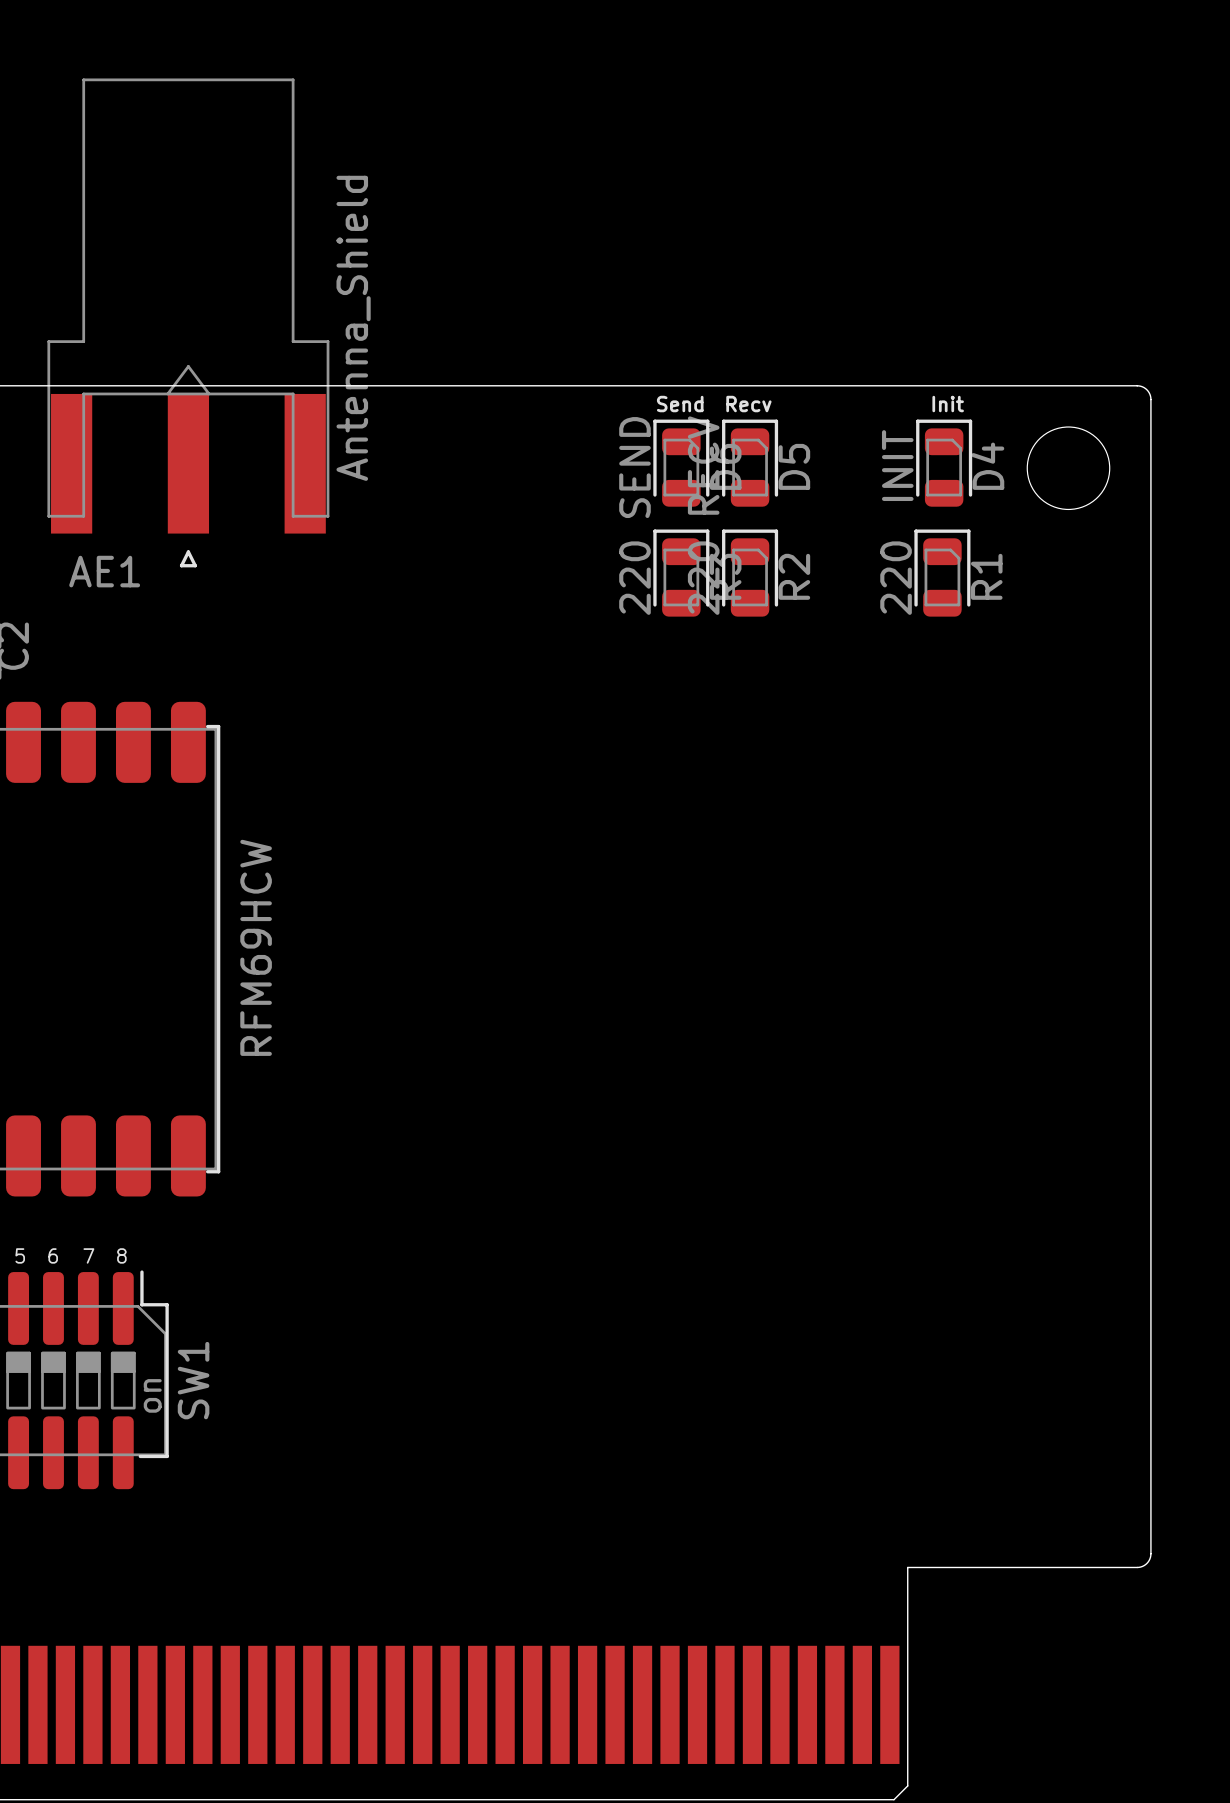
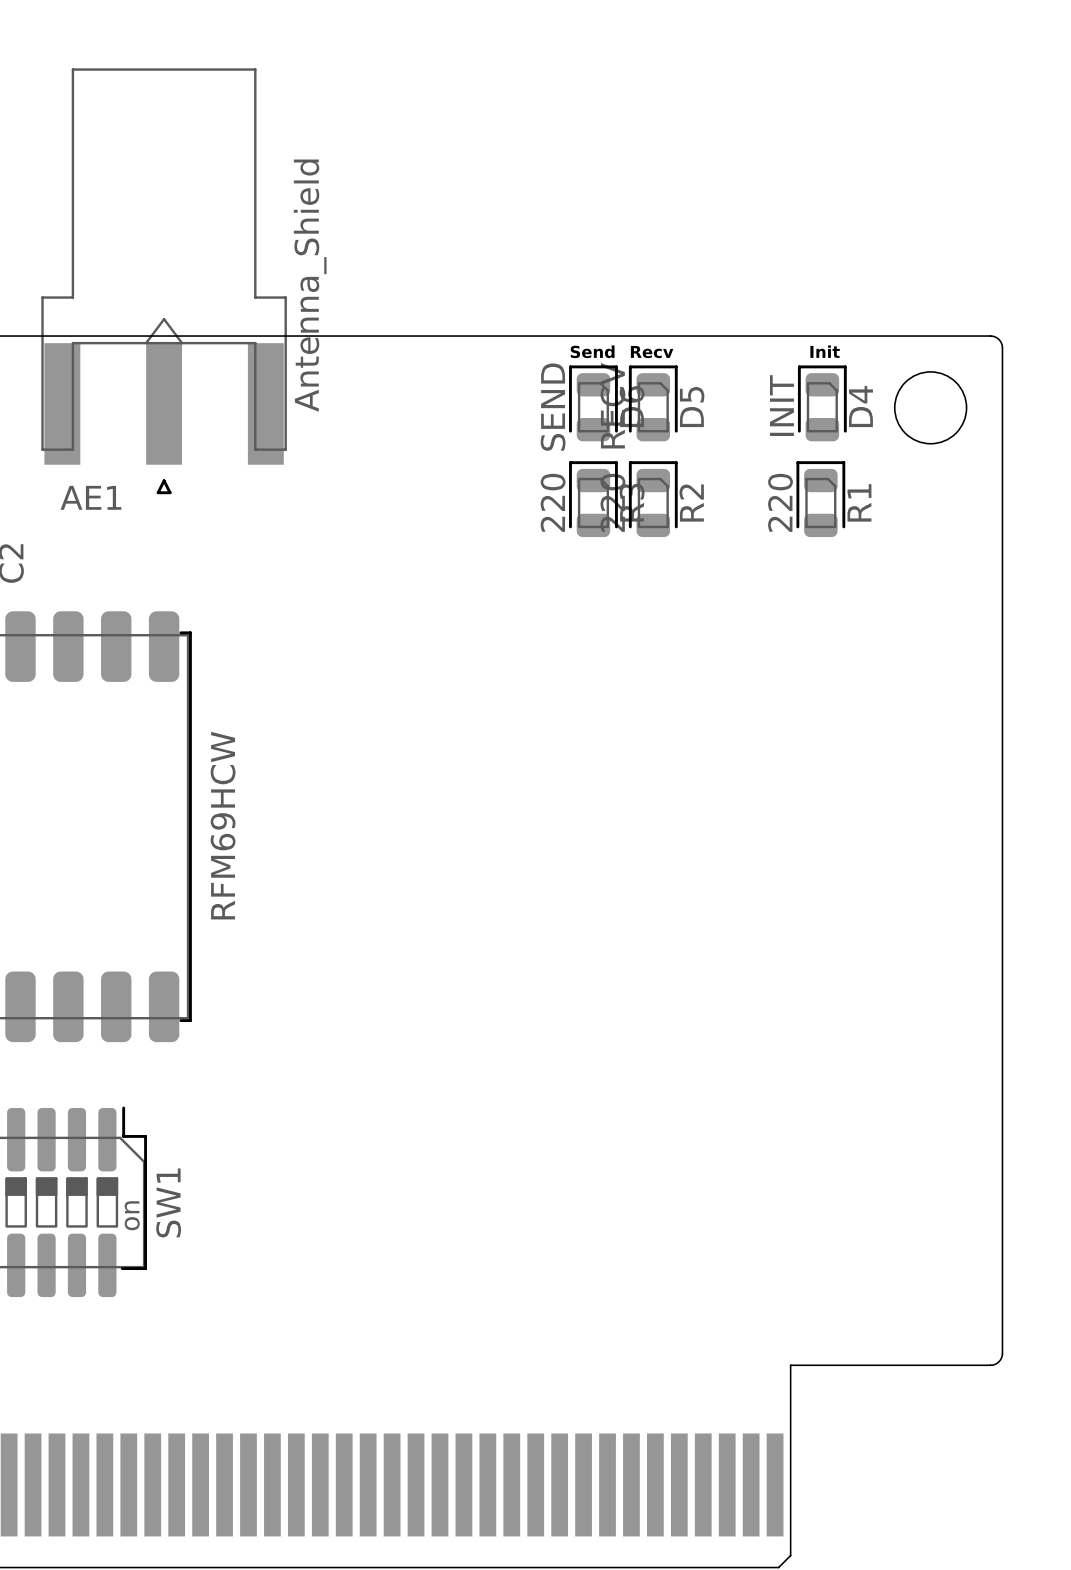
text: 5 (20, 1255) -> none
text: 6 (53, 1255) -> none
text: 7 (88, 1255) -> none
text: 8 (121, 1255) -> none

